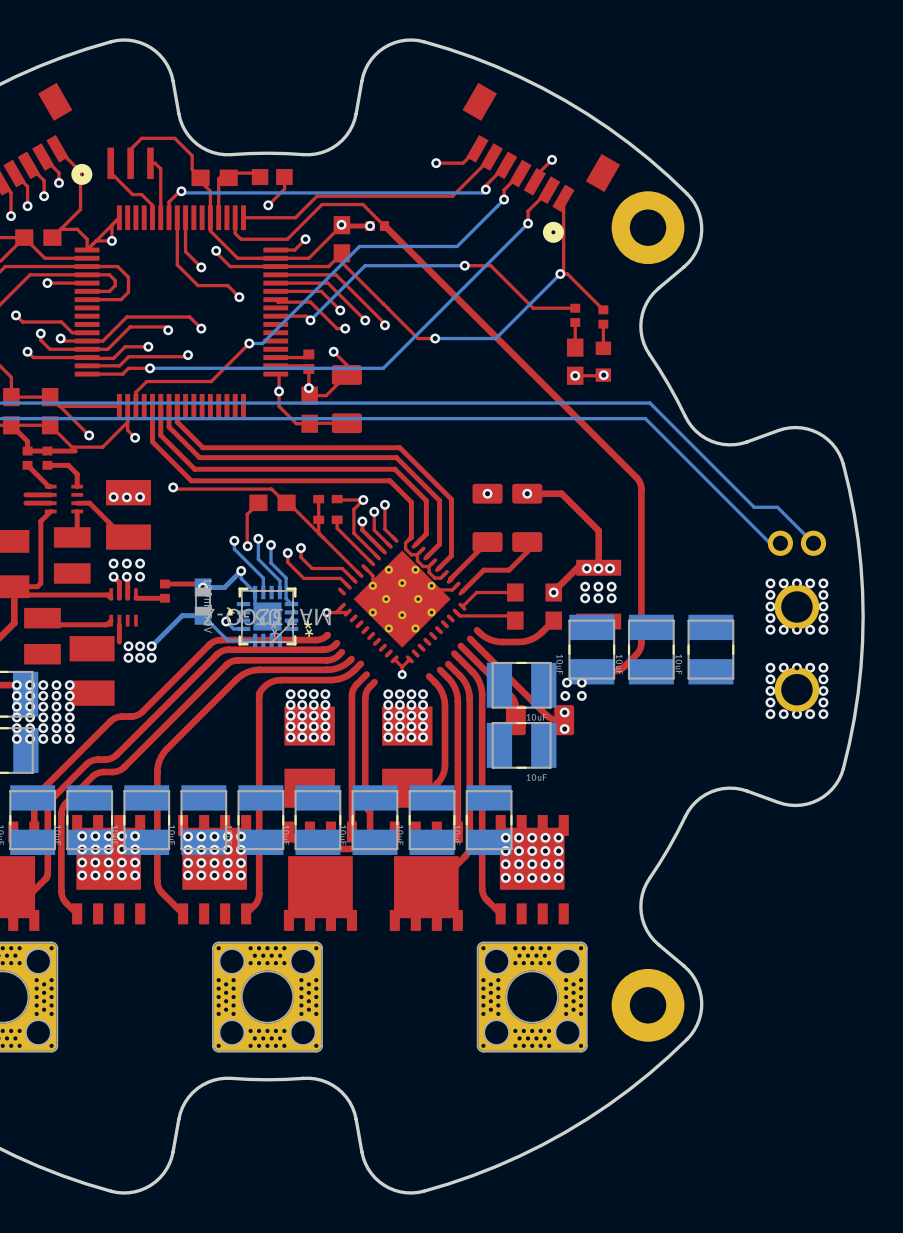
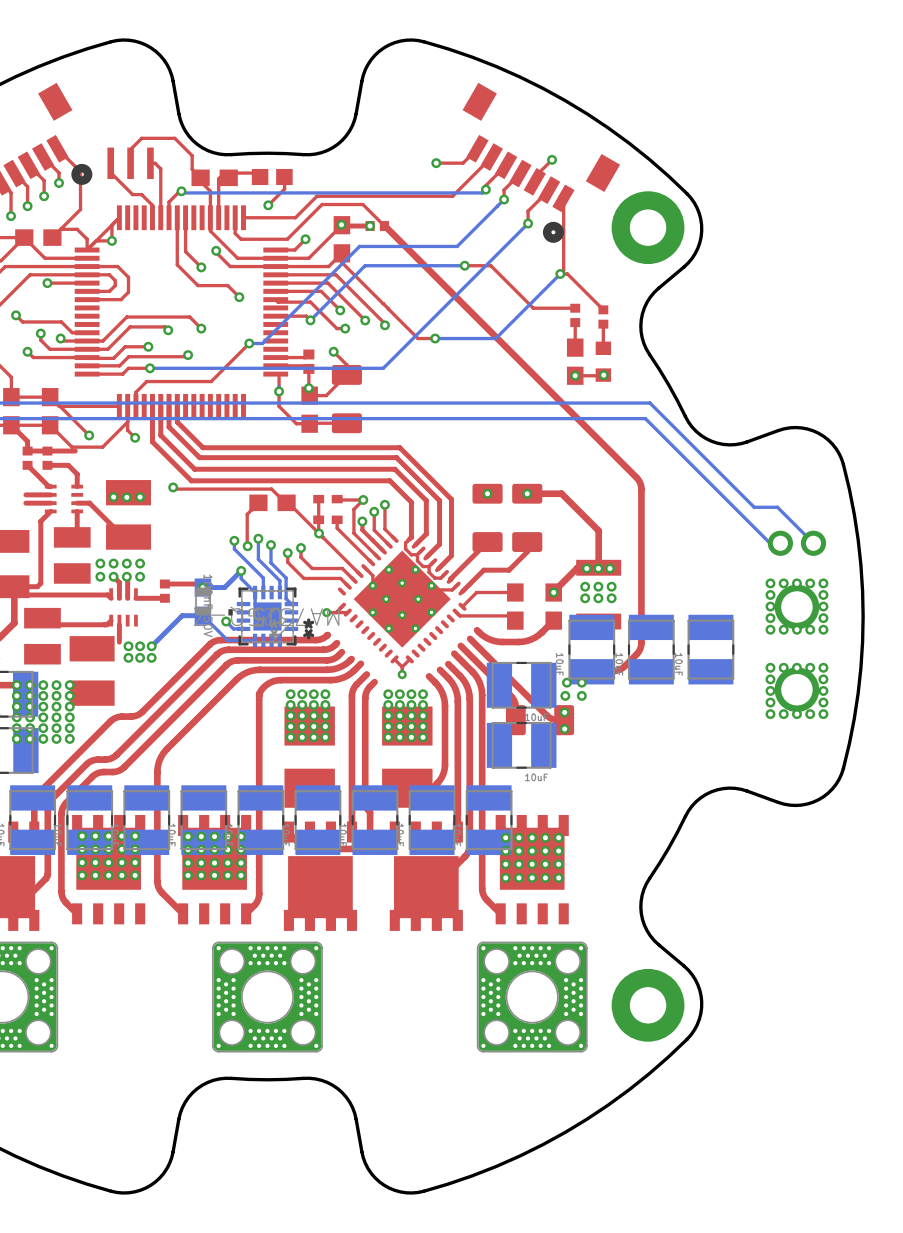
via: none -> (319, 533)
via: none -> (100, 563)
via: none -> (100, 576)

